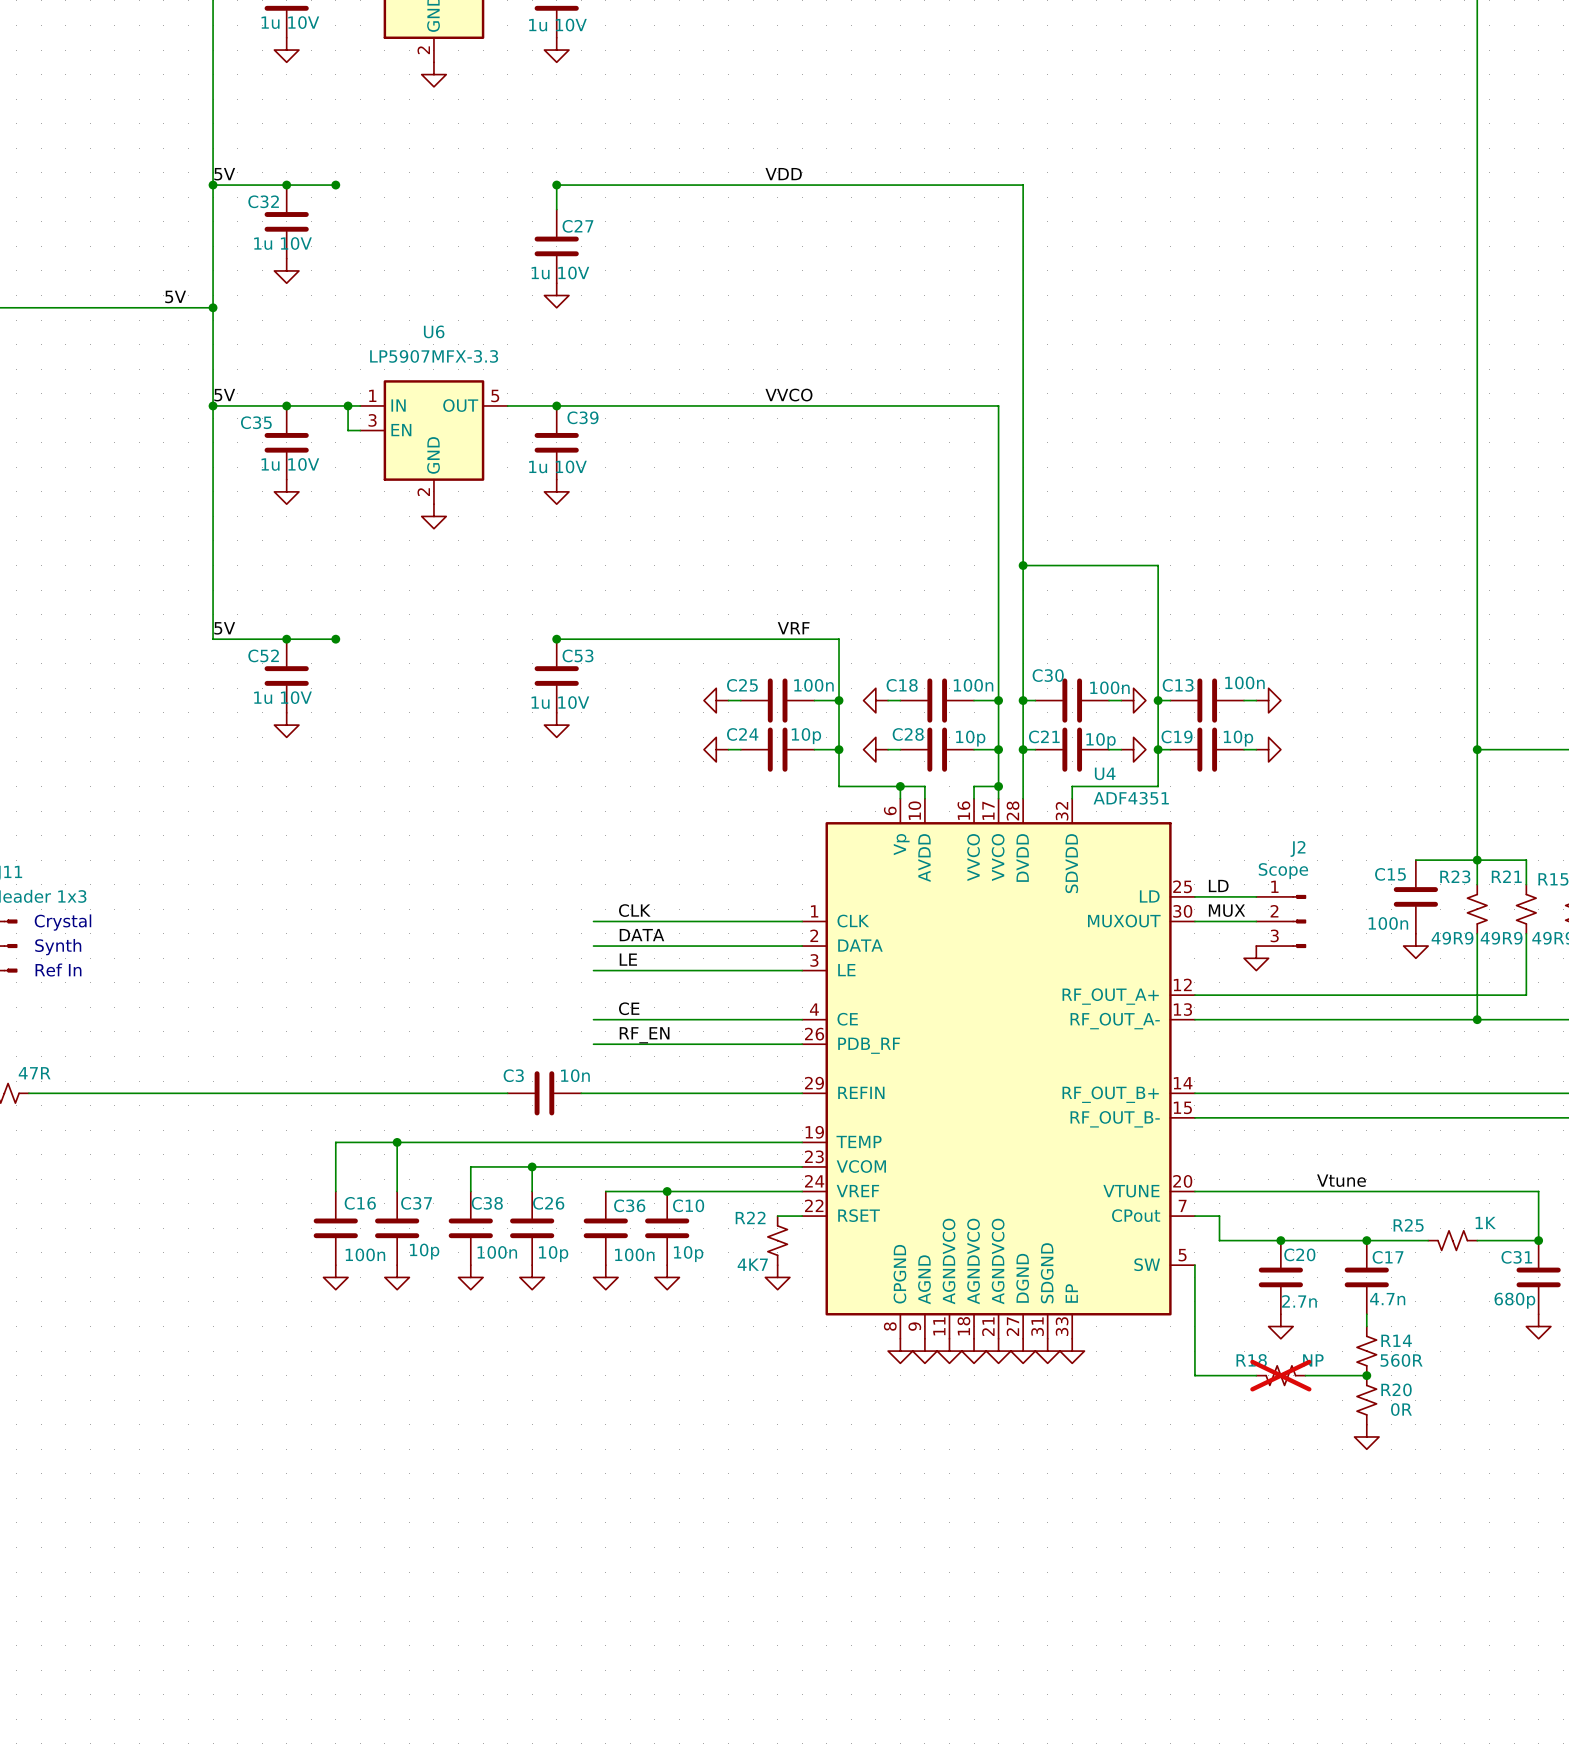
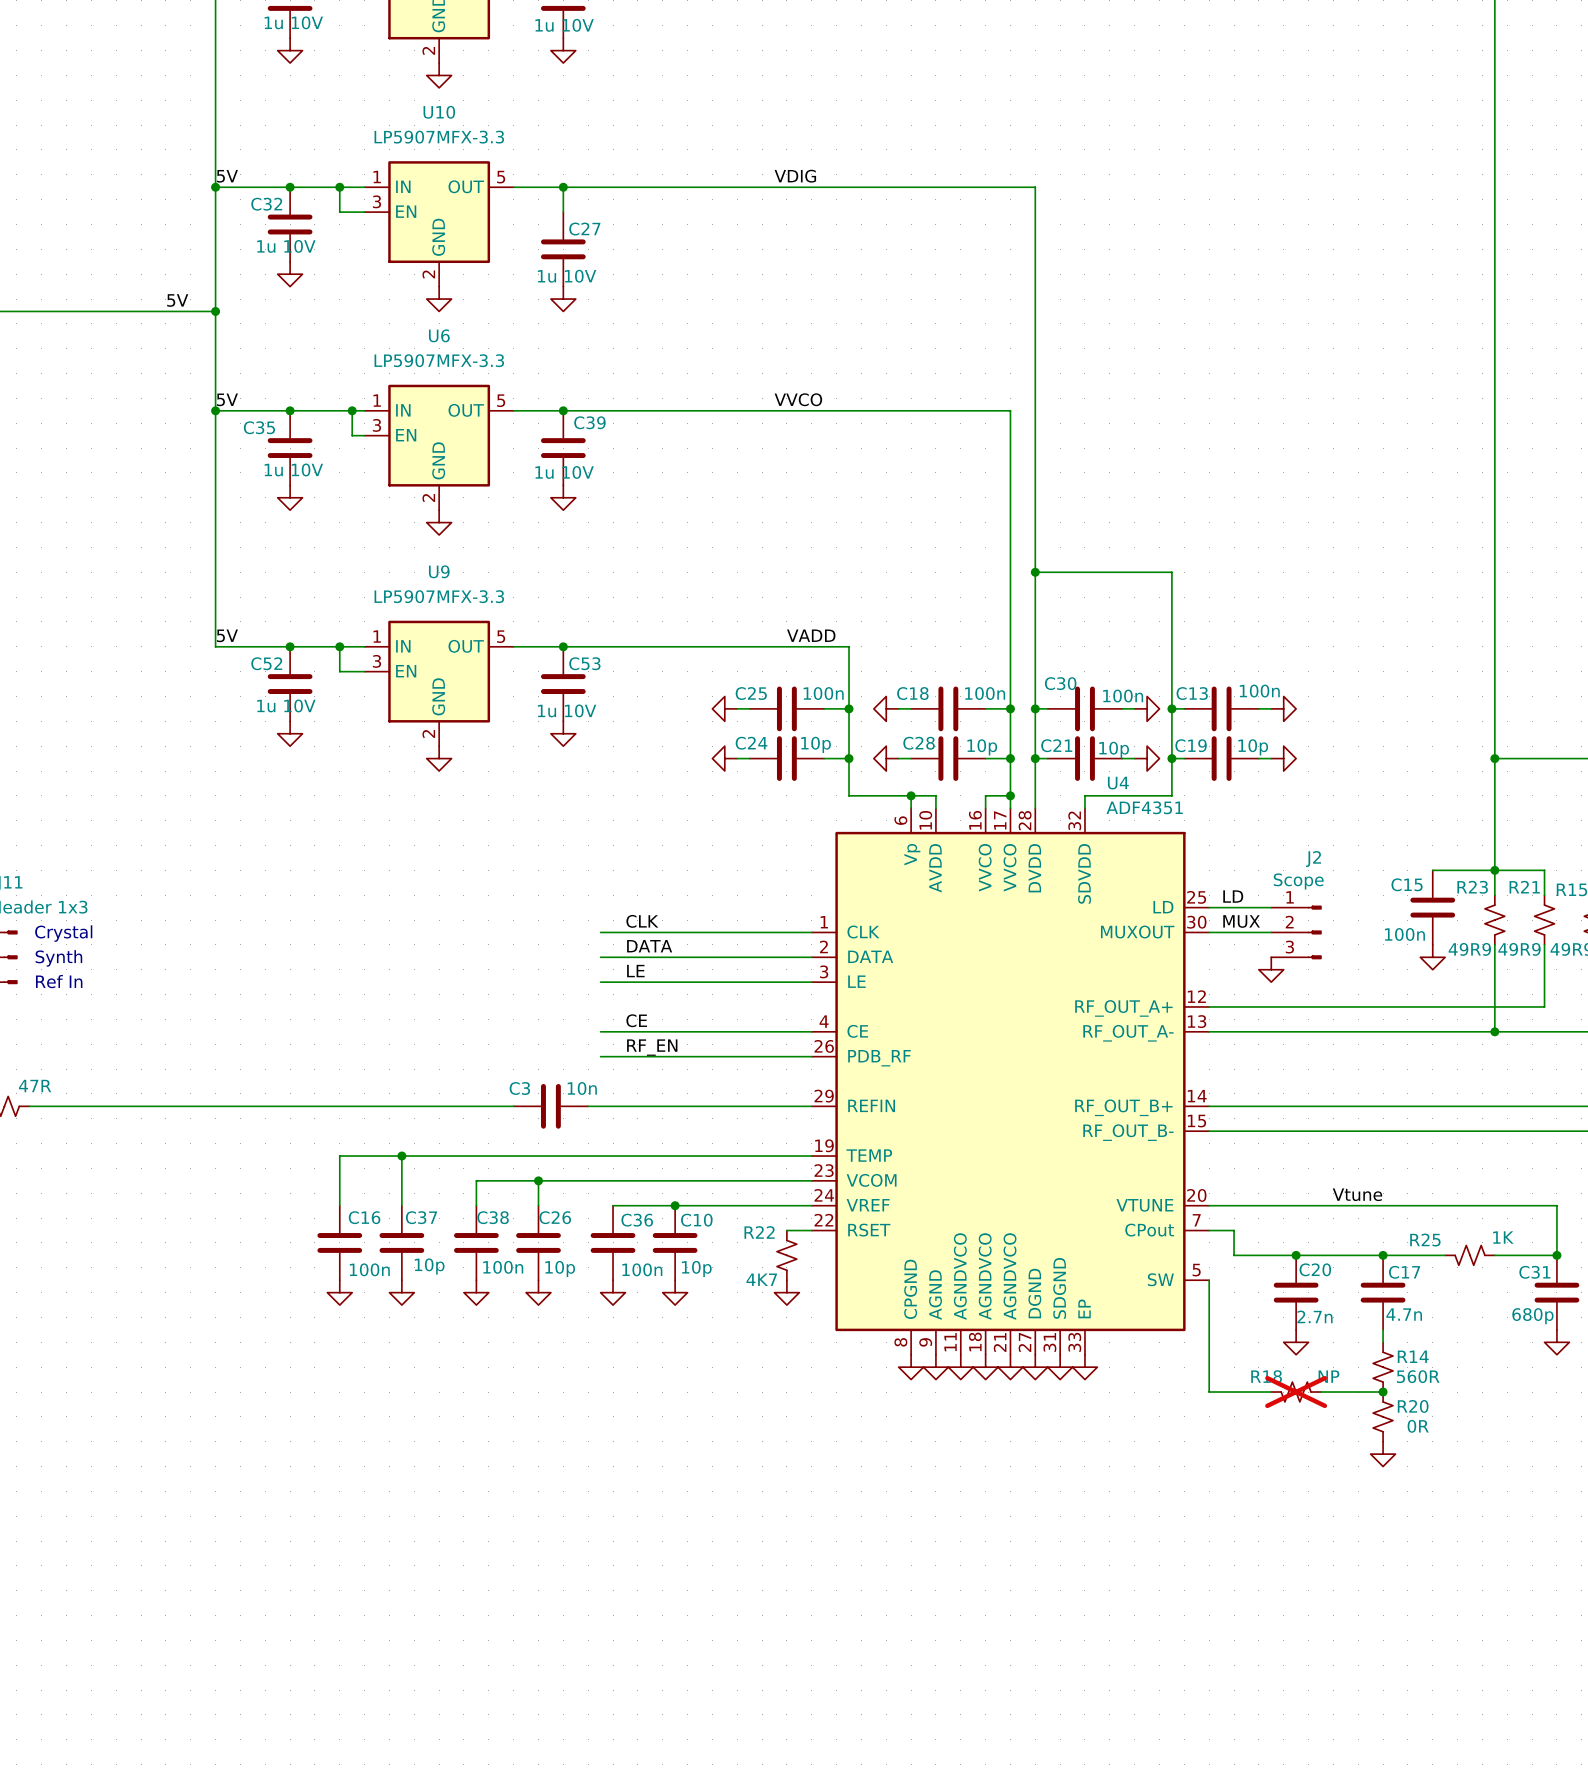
label: VDD (783, 174) -> VDIG (795, 176)
wire: none -> (364, 187) (339, 187) (339, 212) (364, 212)
wire: none -> (513, 187) (563, 187)
U10: none -> LP5907MFX-3.3 (439, 223)
power symbol: none -> (439, 299)
label: VRF (793, 628) -> VADD (811, 635)
wire: none -> (364, 646) (339, 646) (339, 671) (364, 671)
wire: none -> (513, 646) (563, 646)
U9: none -> LP5907MFX-3.3 (439, 683)
power symbol: none -> (439, 758)

